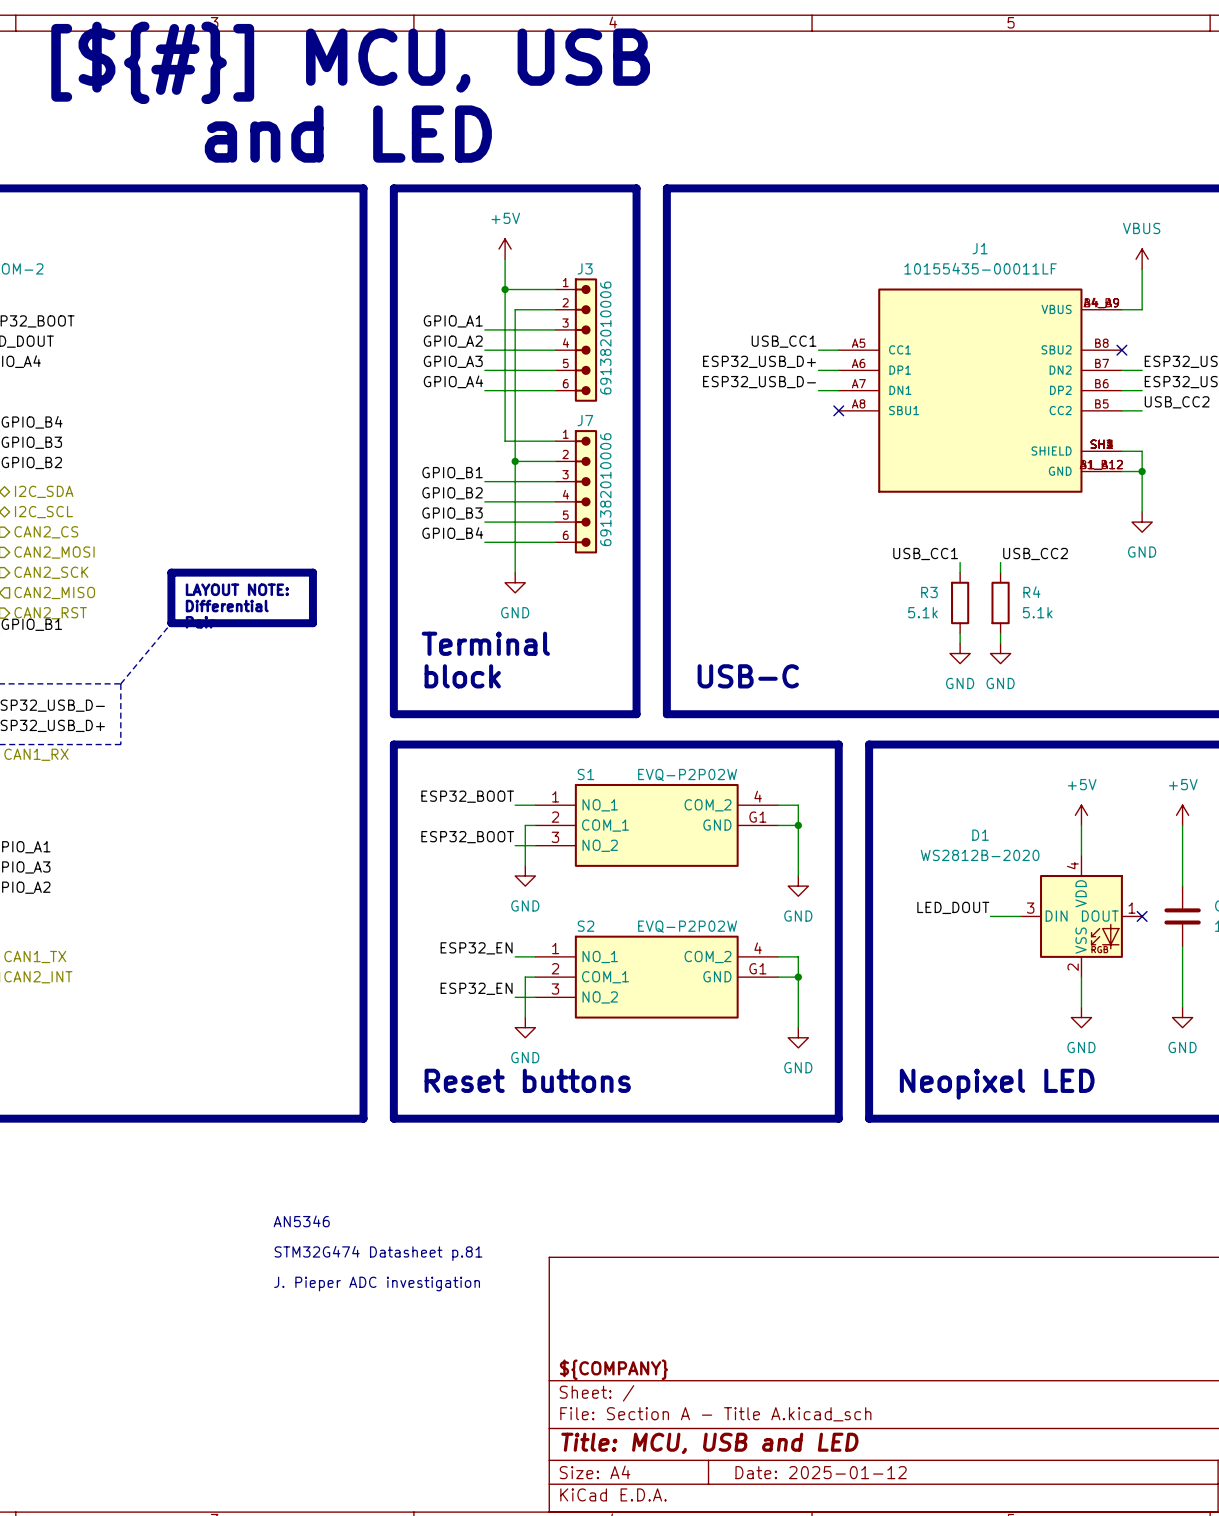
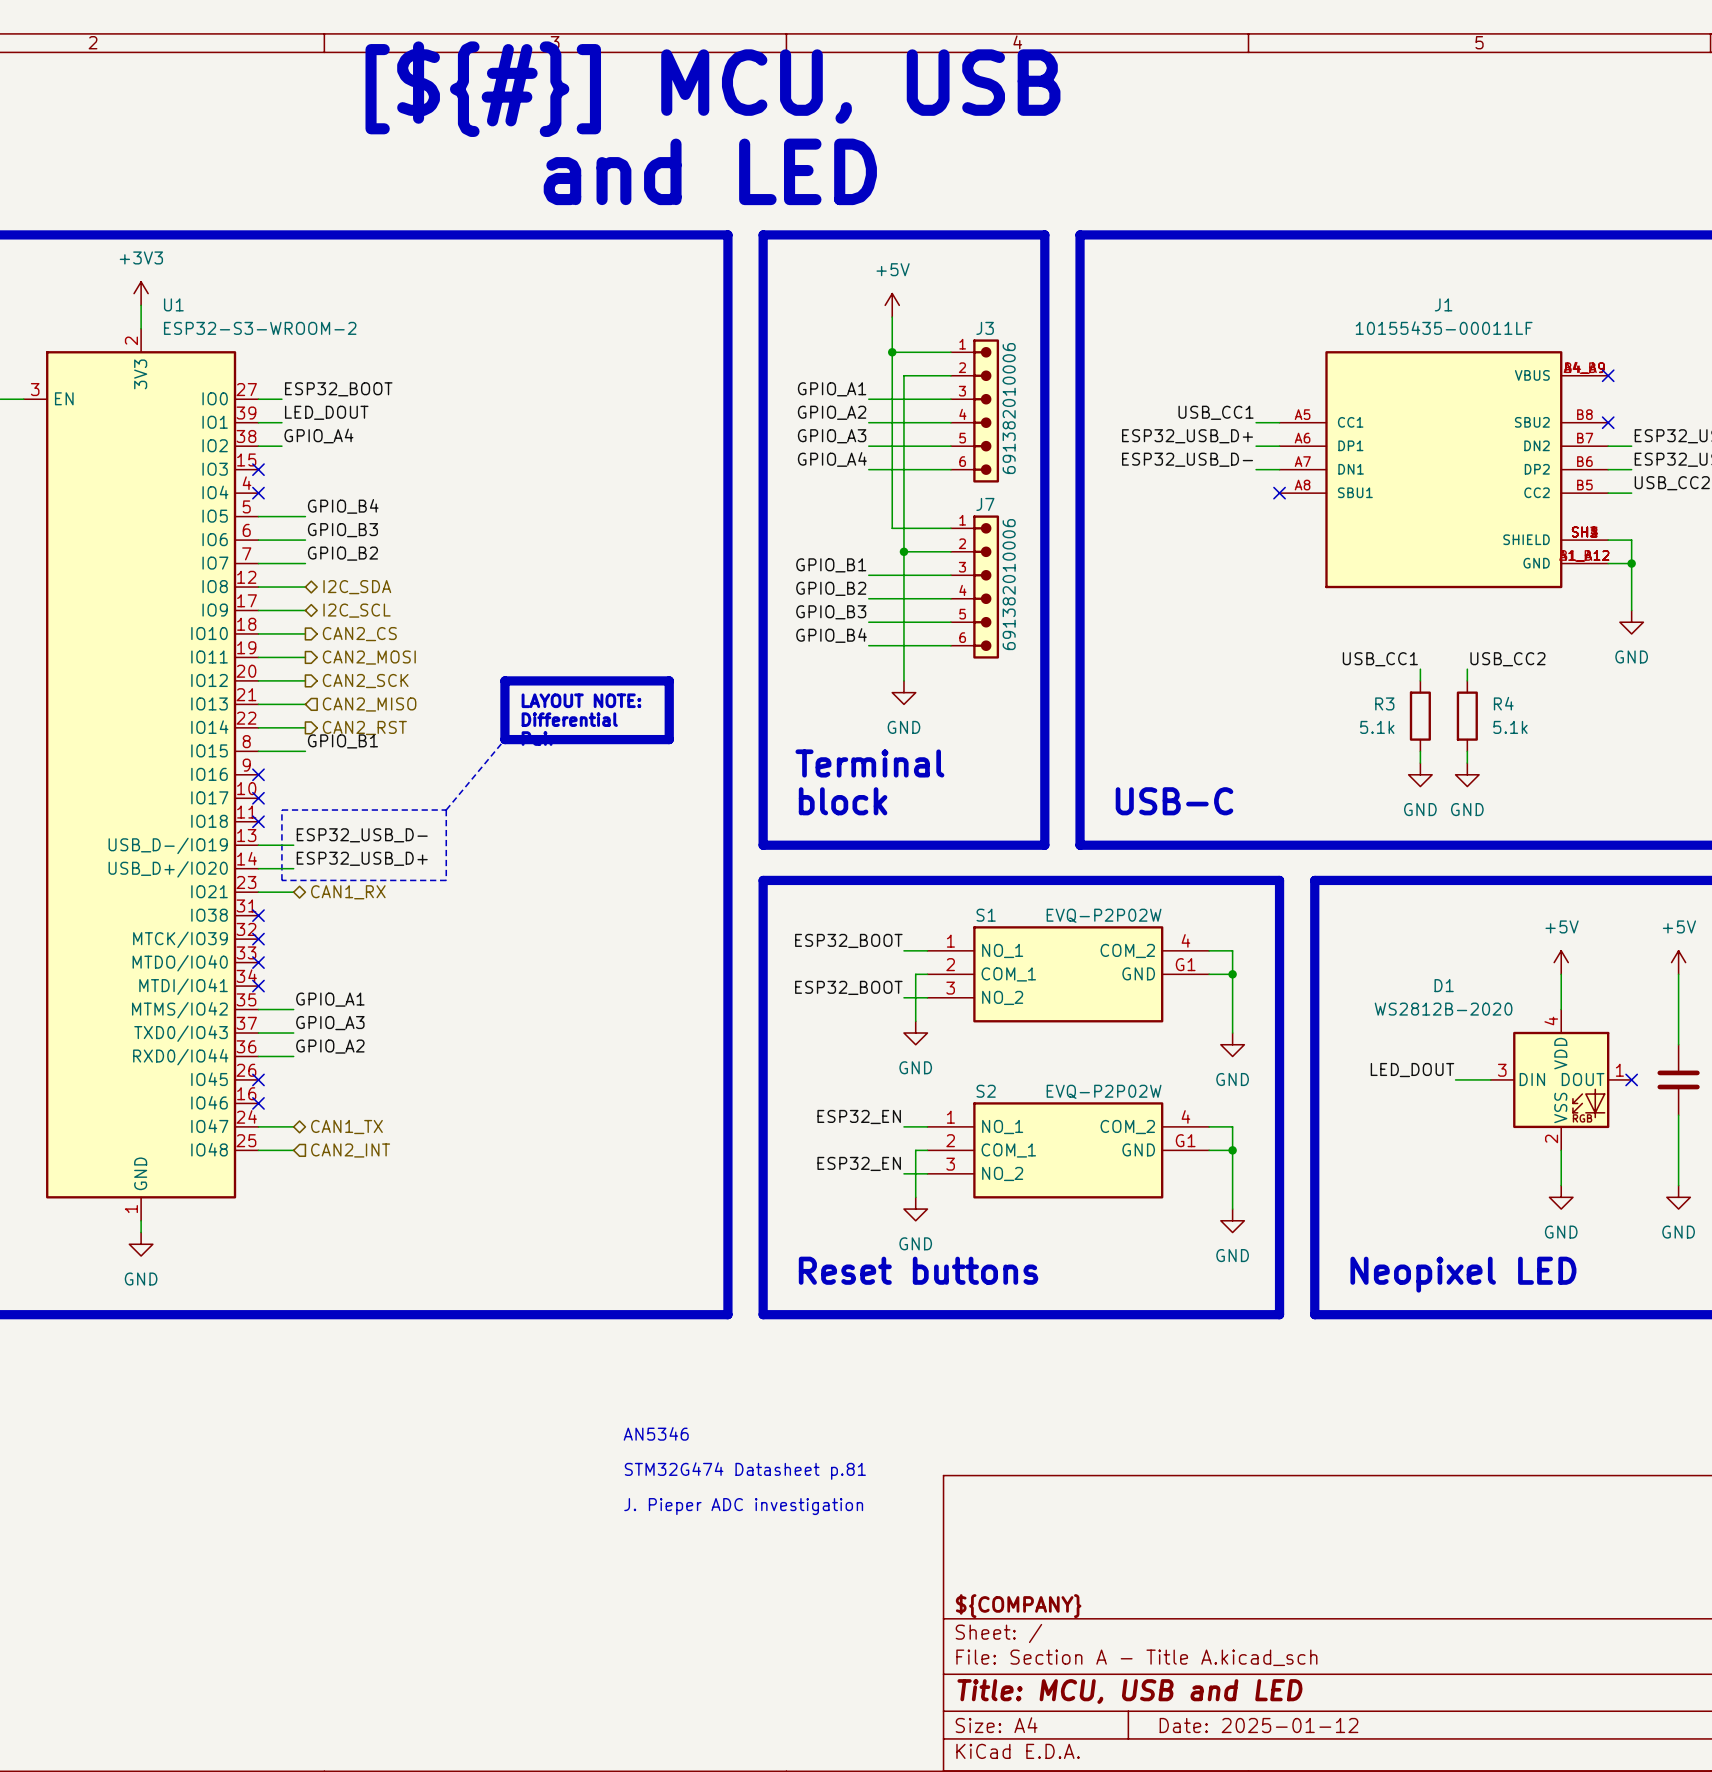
power symbol: VBUS (1142, 259) -> none
wire: (1142, 269) (1142, 309) (1121, 309) -> none
no-connect mark: none -> (1608, 375)

